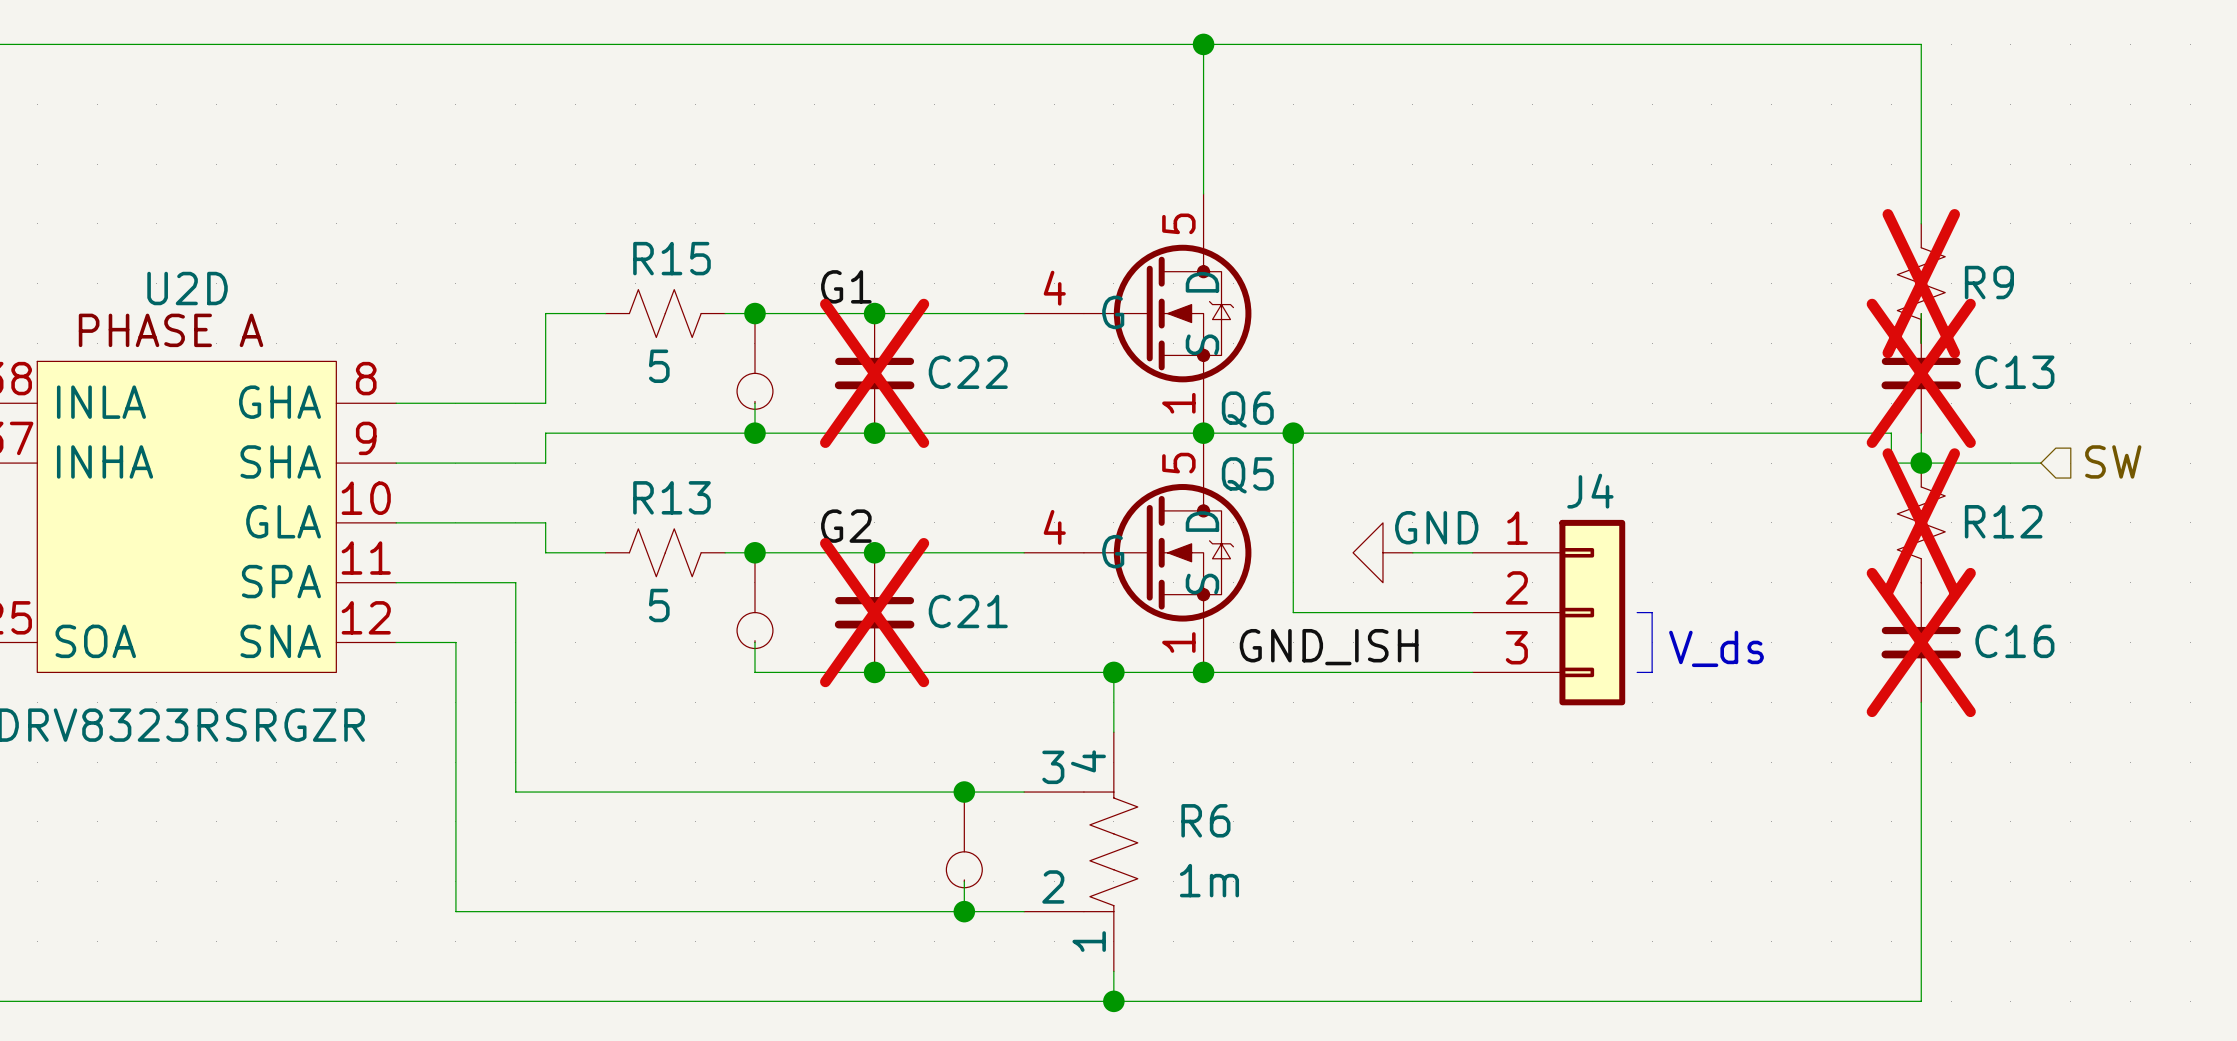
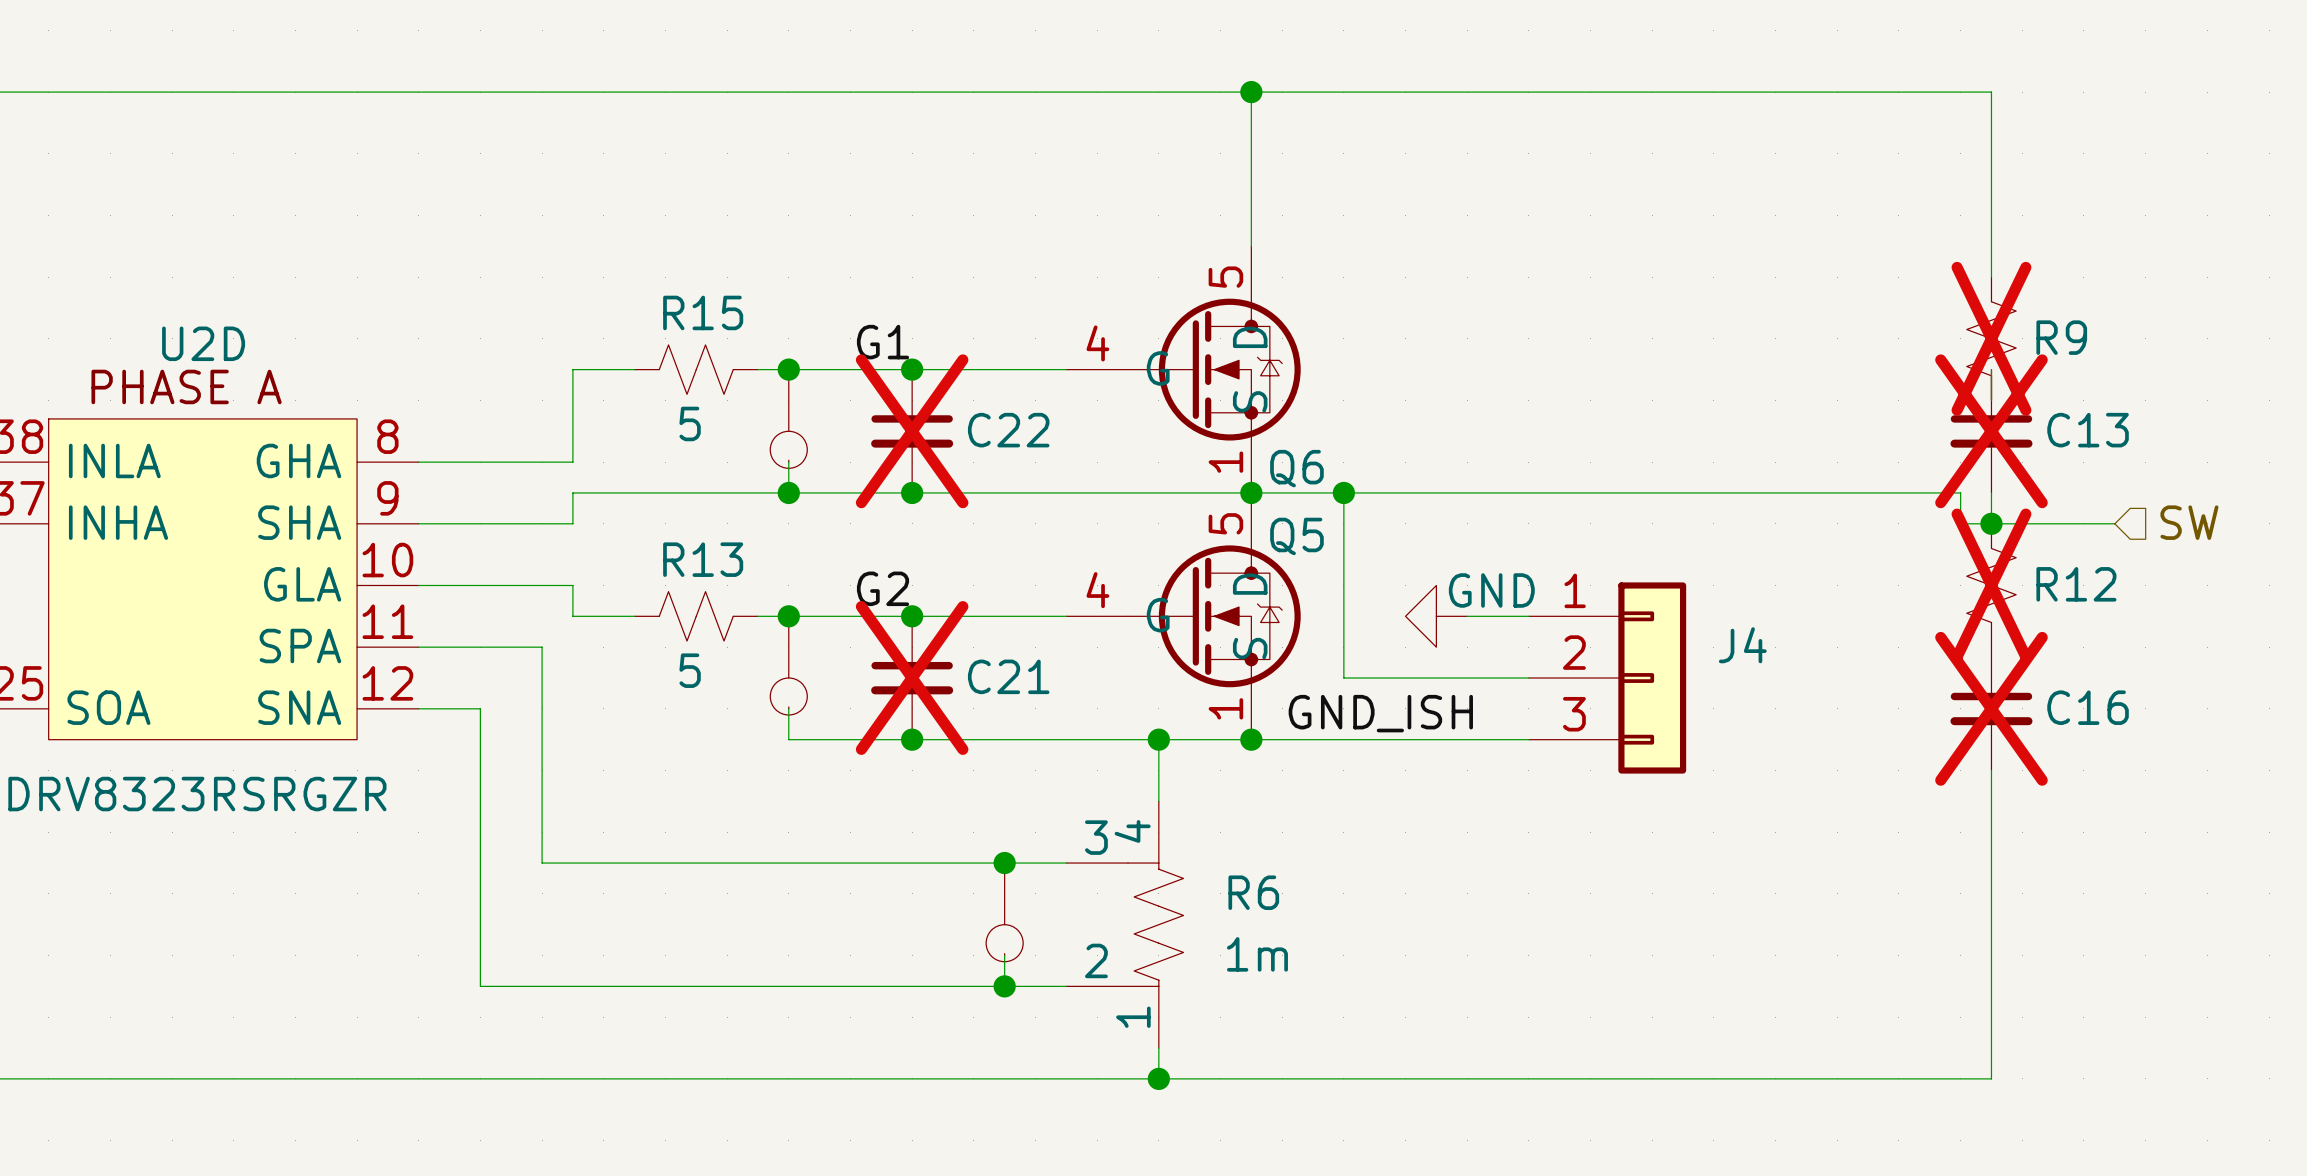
J4 name position: J4 (1590, 491) -> J4 (1742, 645)
line: (1637, 612) (1652, 612) (1652, 672) (1637, 672) -> none
text: V_ds (1716, 648) -> none

